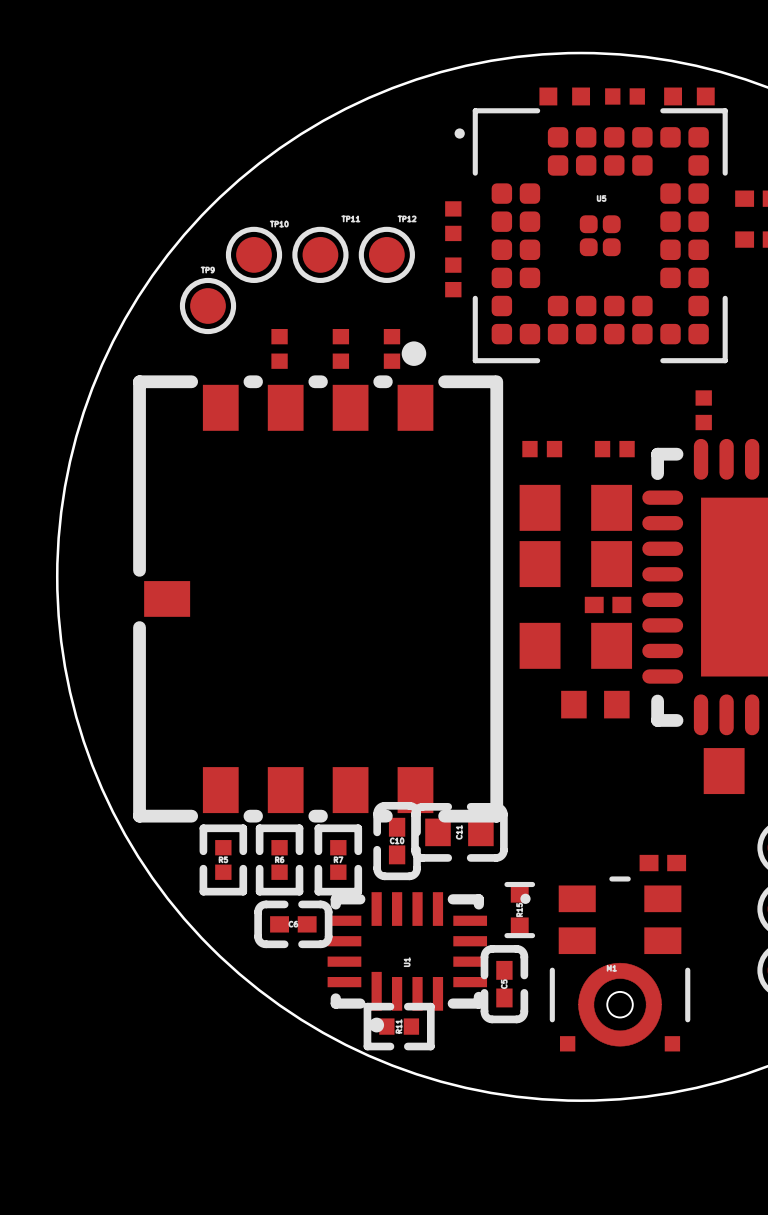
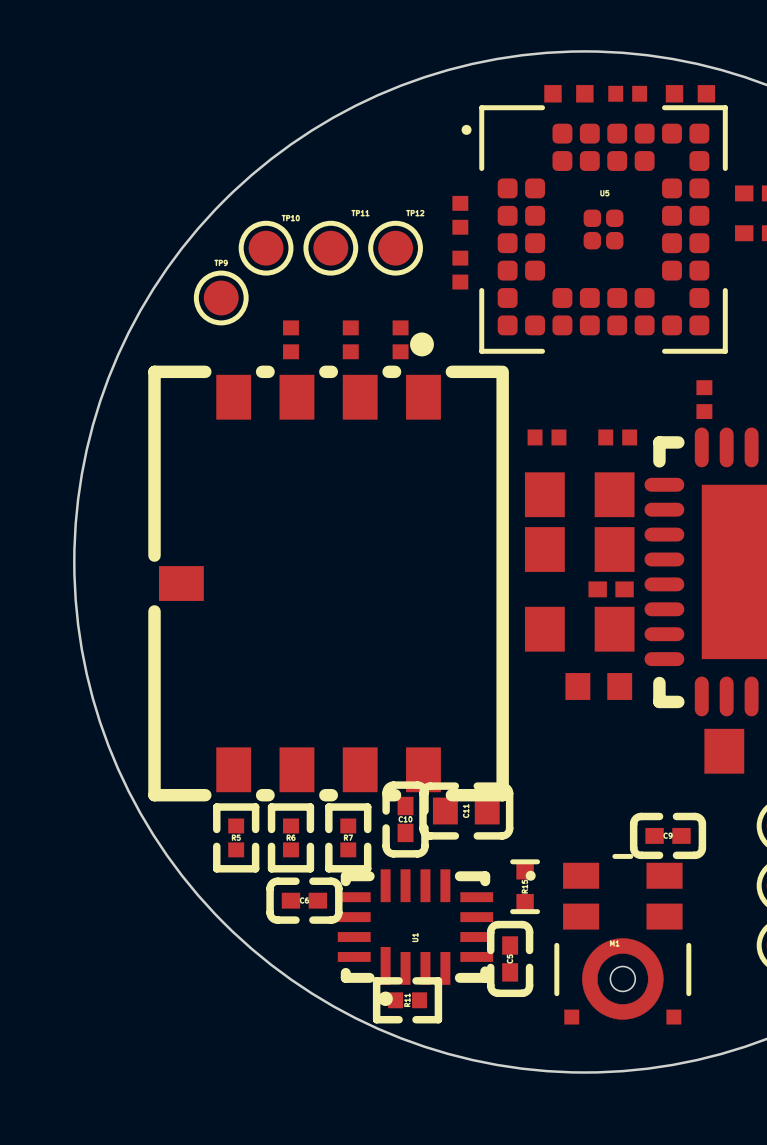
part: none -> (668, 835)
part: (662, 863) -> none

